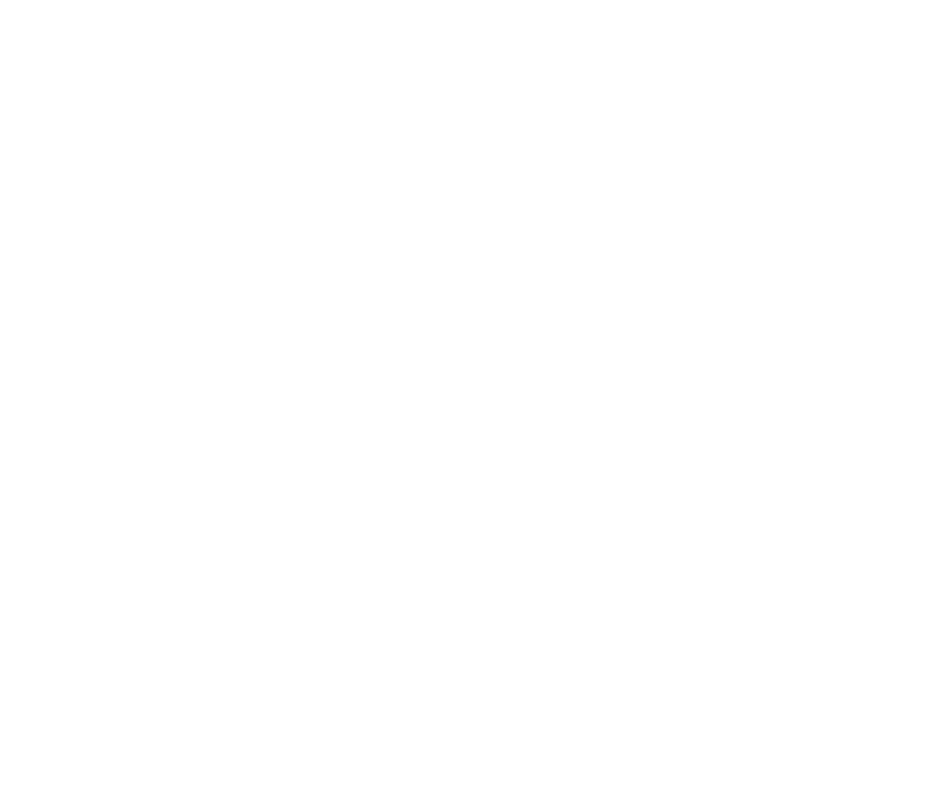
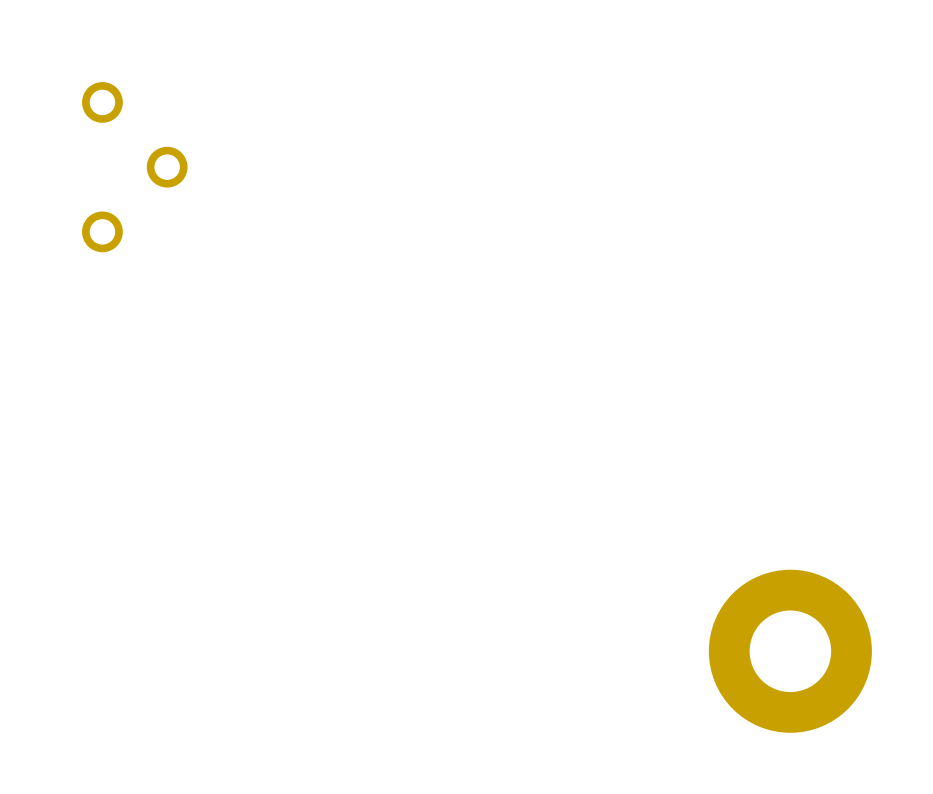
part: none -> (134, 167)
part: none -> (790, 651)

